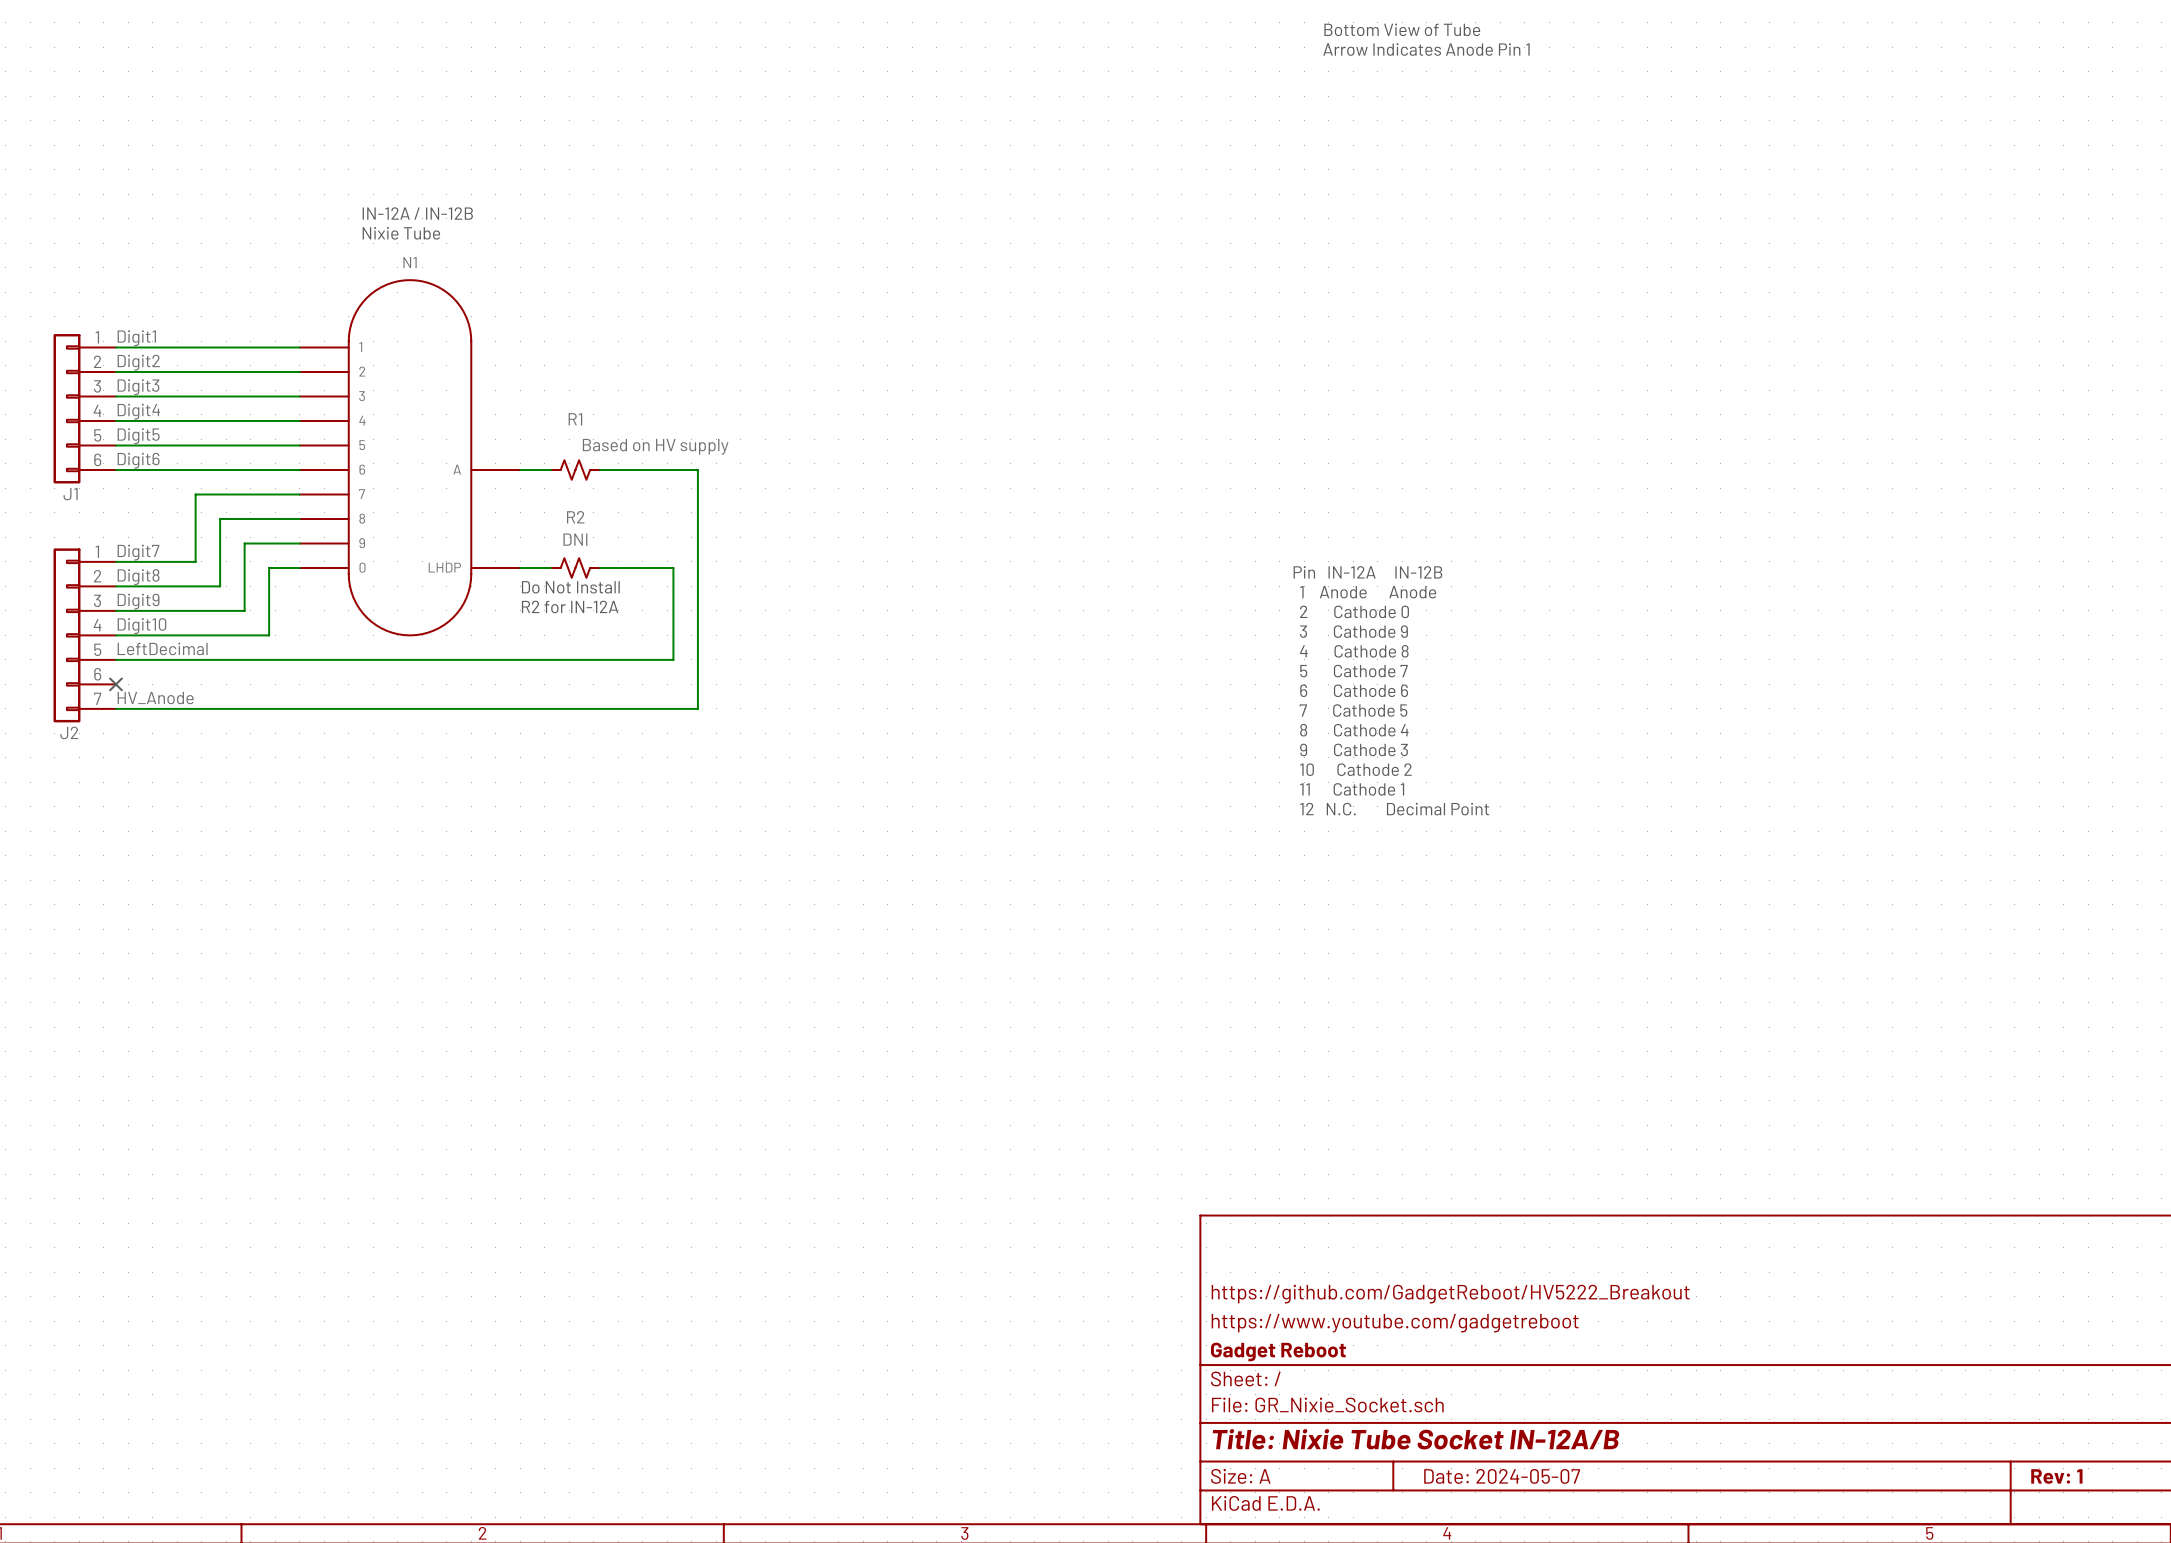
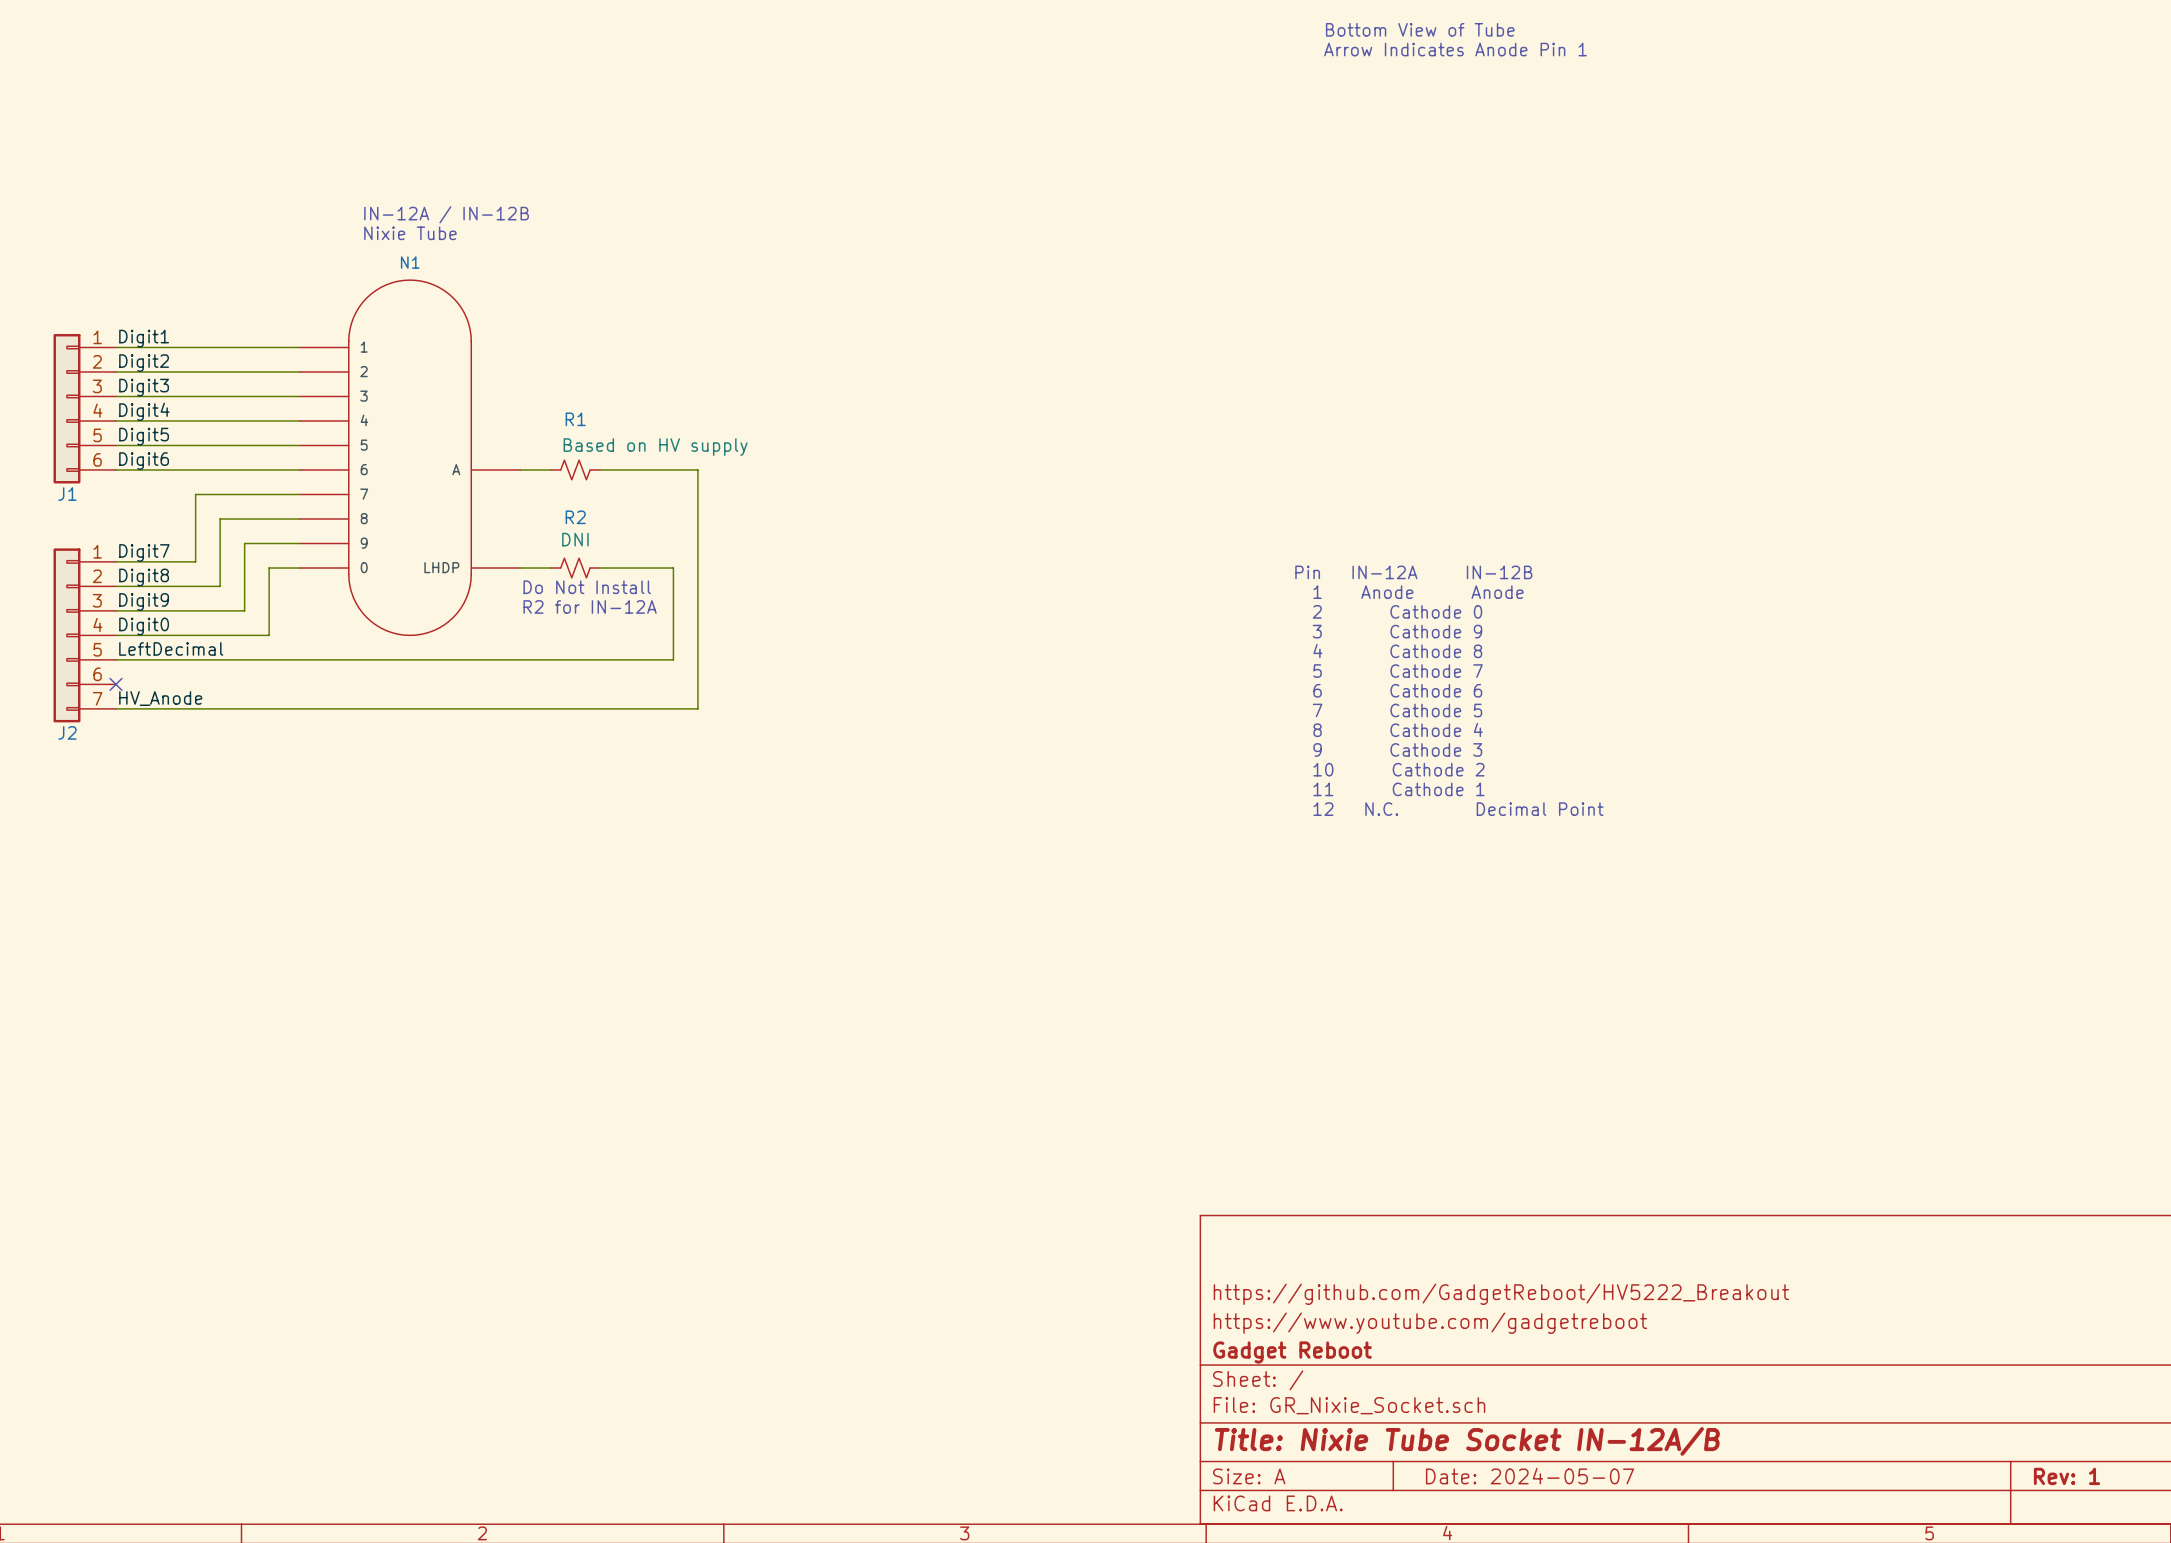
label: Digit10 (141, 626) -> Digit0 (144, 626)

